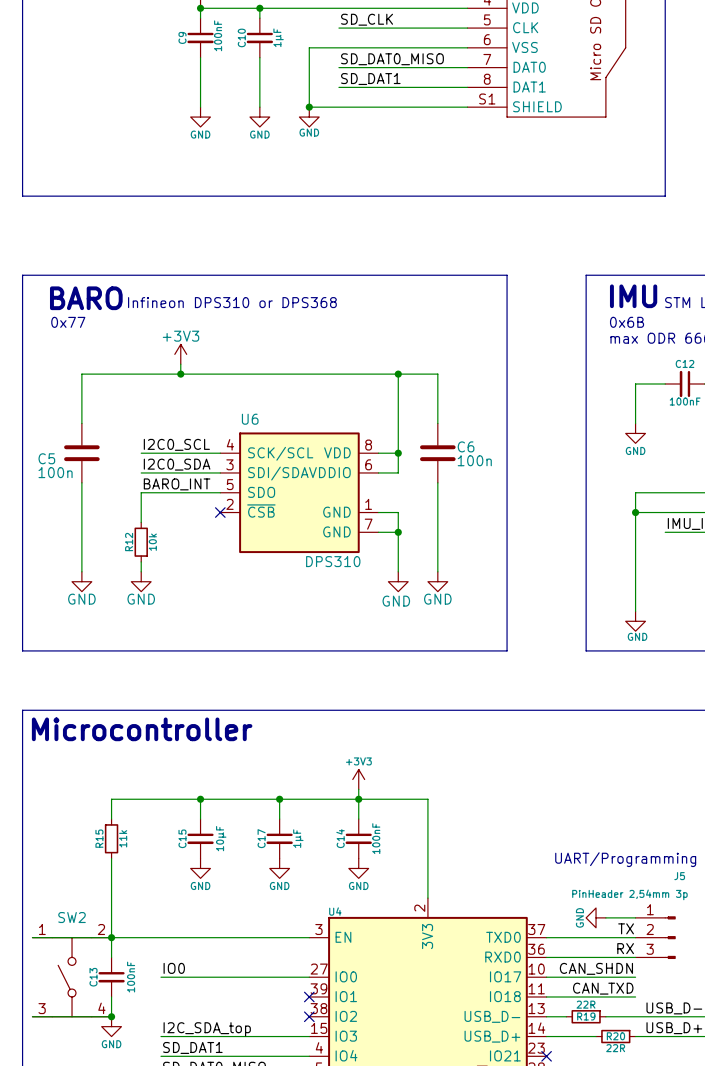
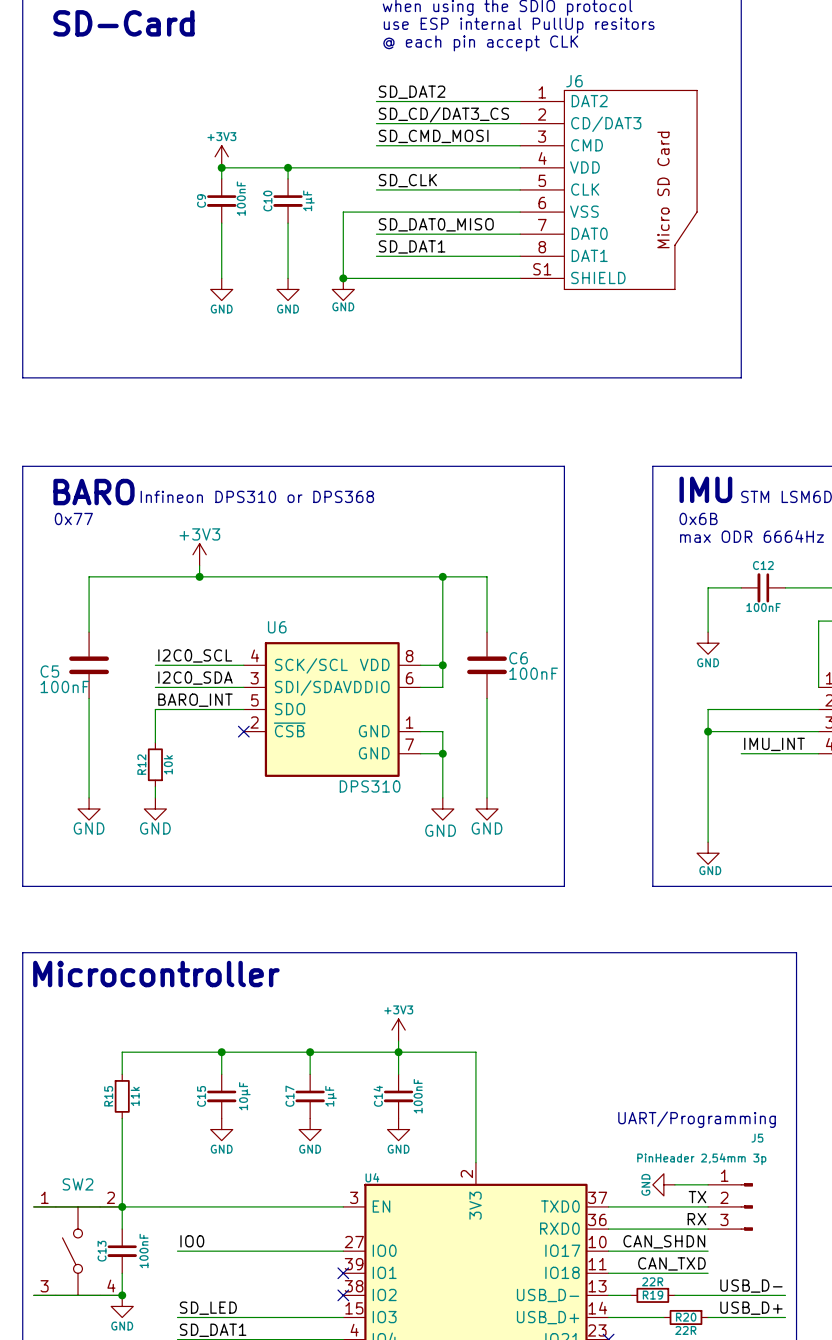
C6 value: 100n (474, 460) -> 100nF (533, 673)
C5 value: 100n (55, 472) -> 100nF (64, 686)
label: I2C_SDA_top (207, 1029) -> SD_LED (208, 1308)

